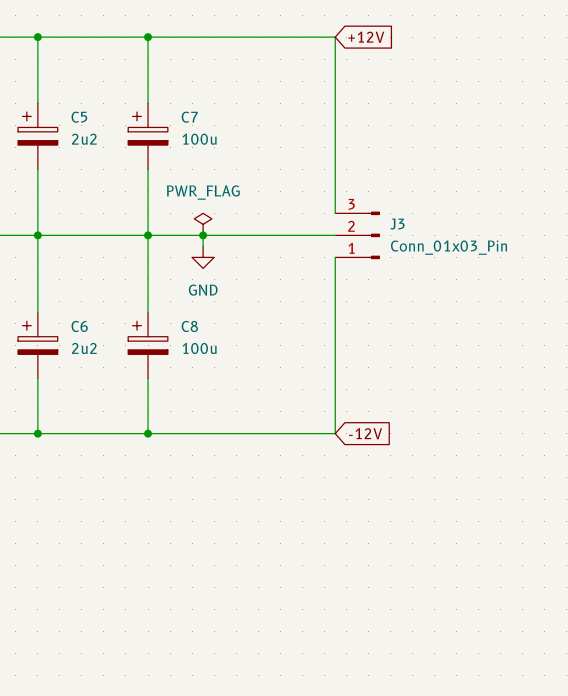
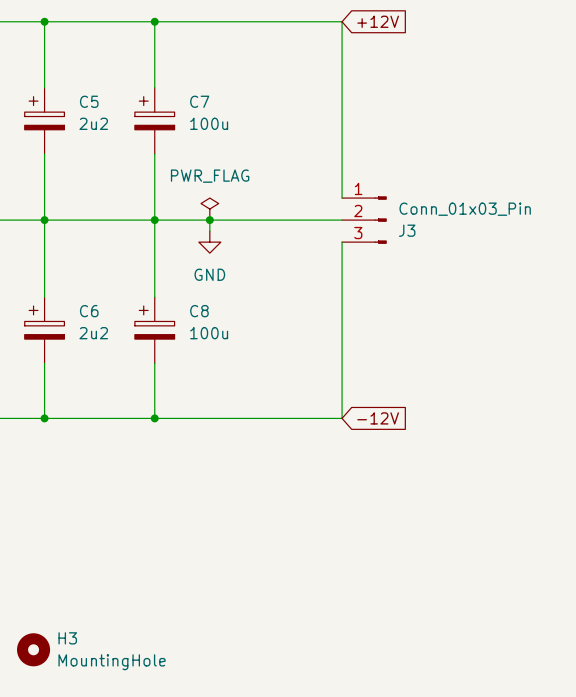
J3 flip: as is (373, 235) -> up-down (380, 220)
H3: none -> MountingHole (33, 649)

